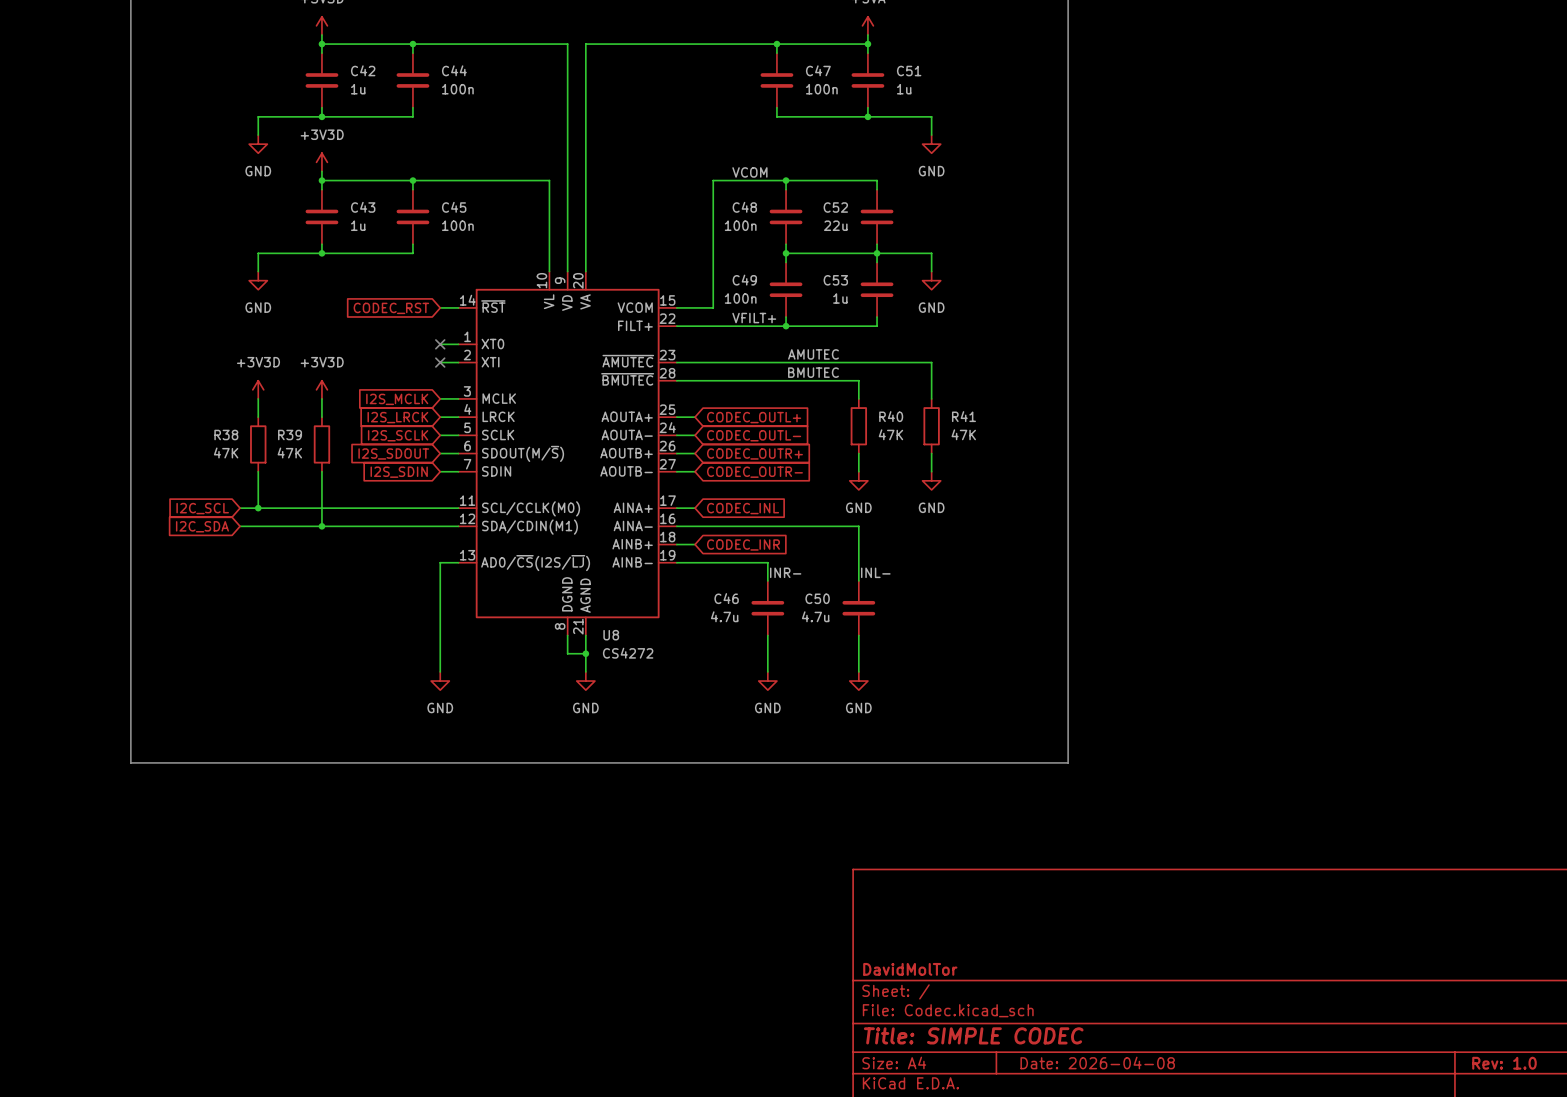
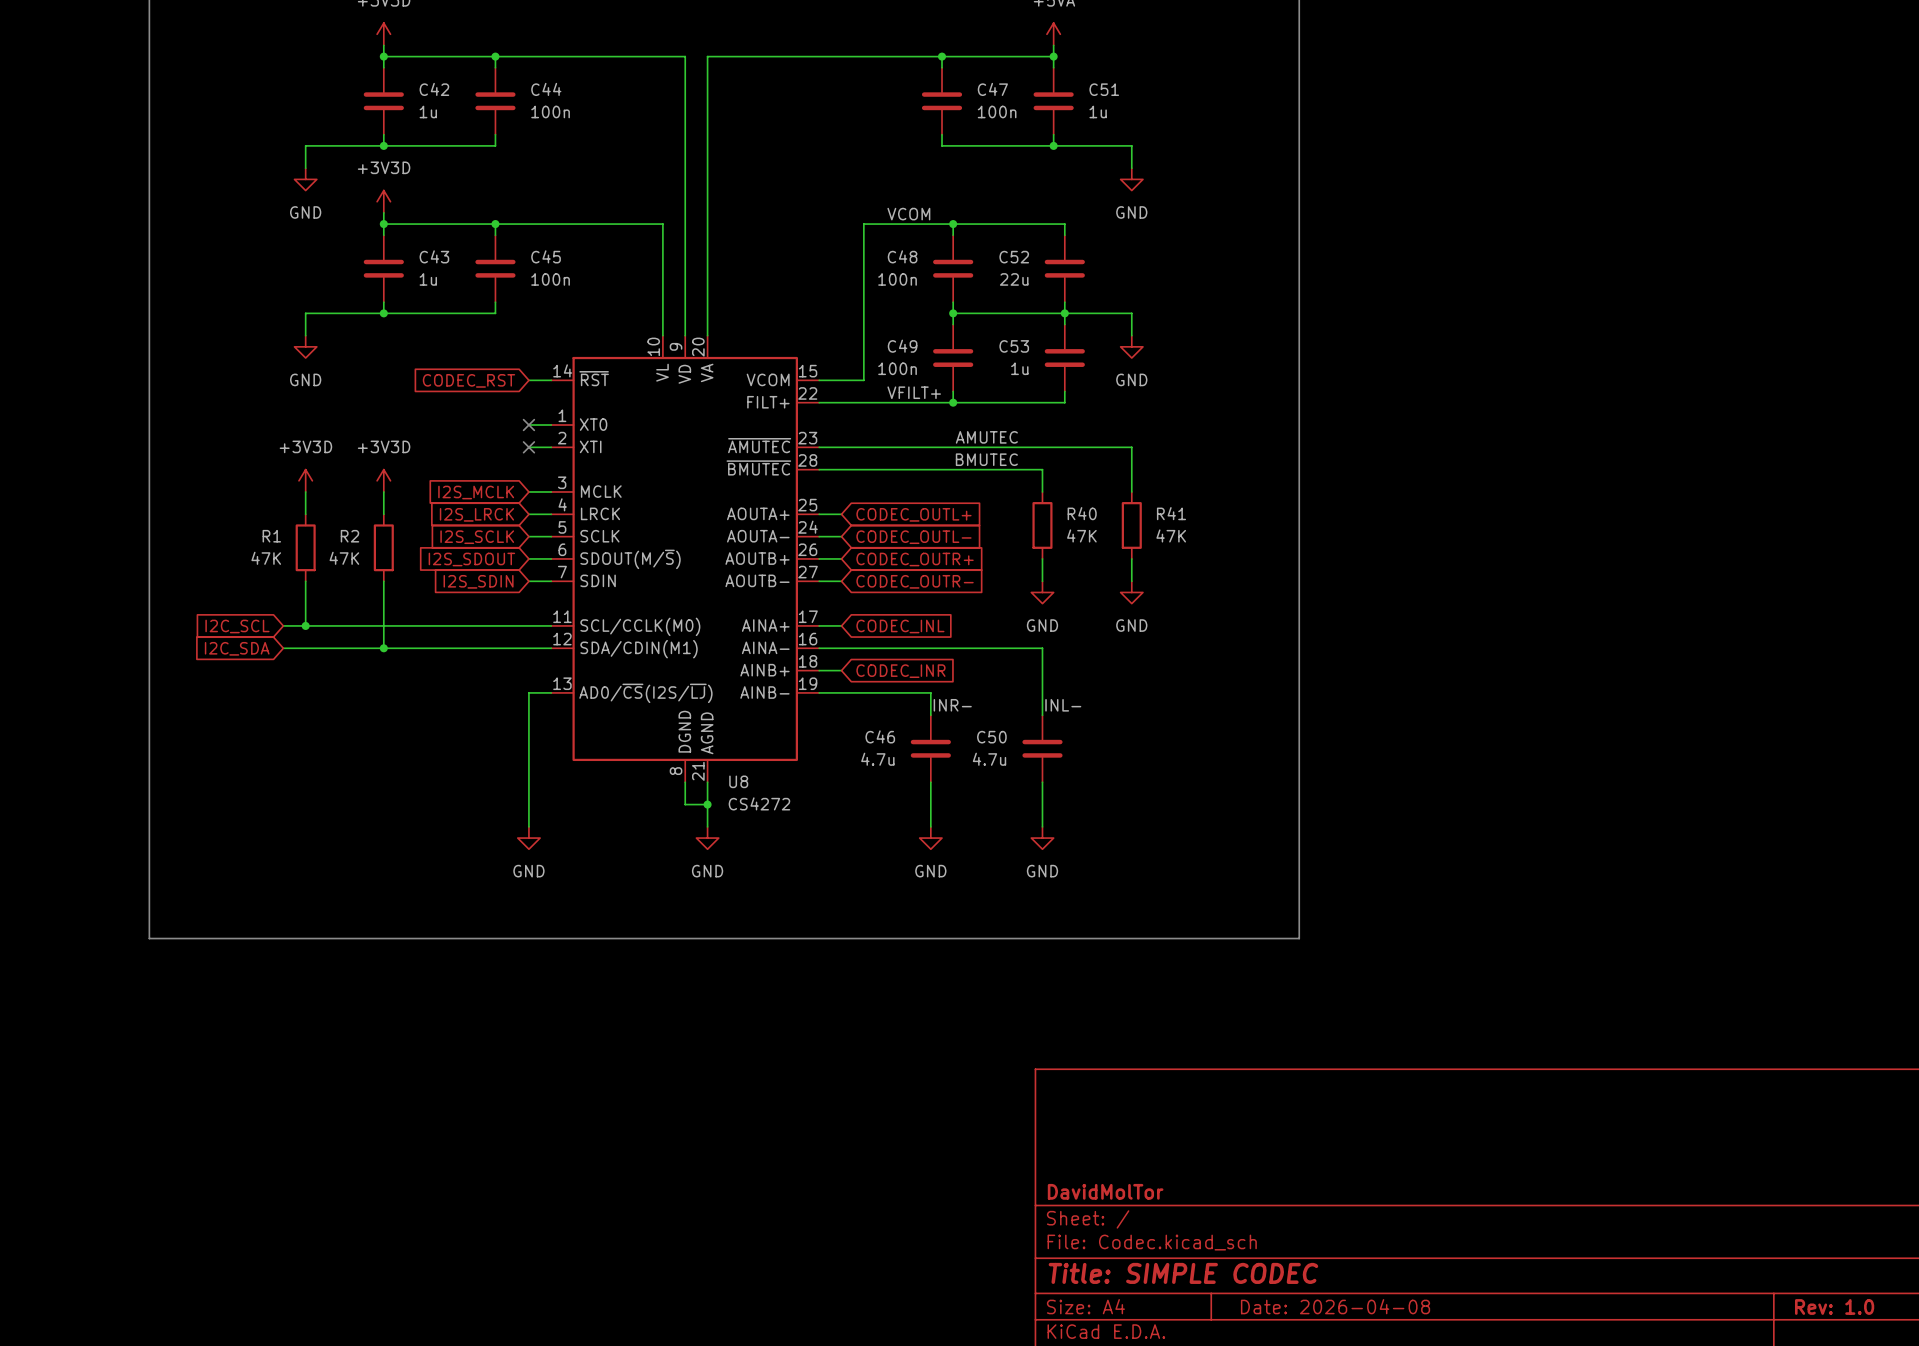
R38 name: R38 (226, 435) -> R1 (271, 536)
R39 name: R39 (290, 435) -> R2 (349, 536)

